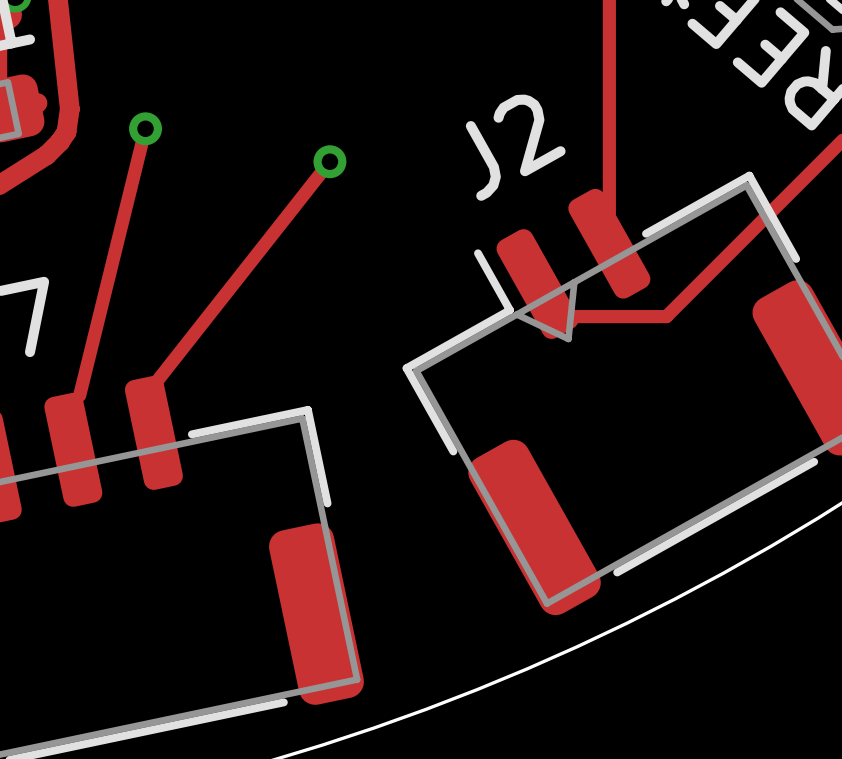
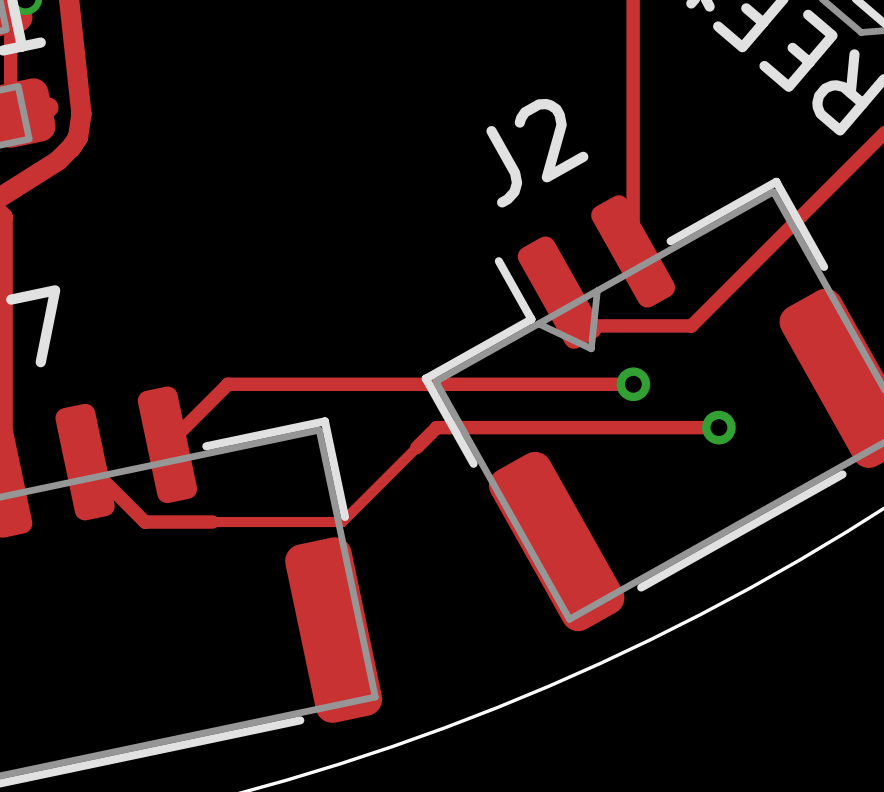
track: (145, 128) (79, 395) -> none
via: (145, 128) -> none
track: (329, 161) (158, 379) -> none
via: (329, 161) -> none
track: none -> (633, 384) (228, 384) (167, 444)
via: none -> (633, 384)
track: none -> (718, 427) (436, 427) (342, 522) (144, 522) (85, 462)
via: none -> (718, 427)

